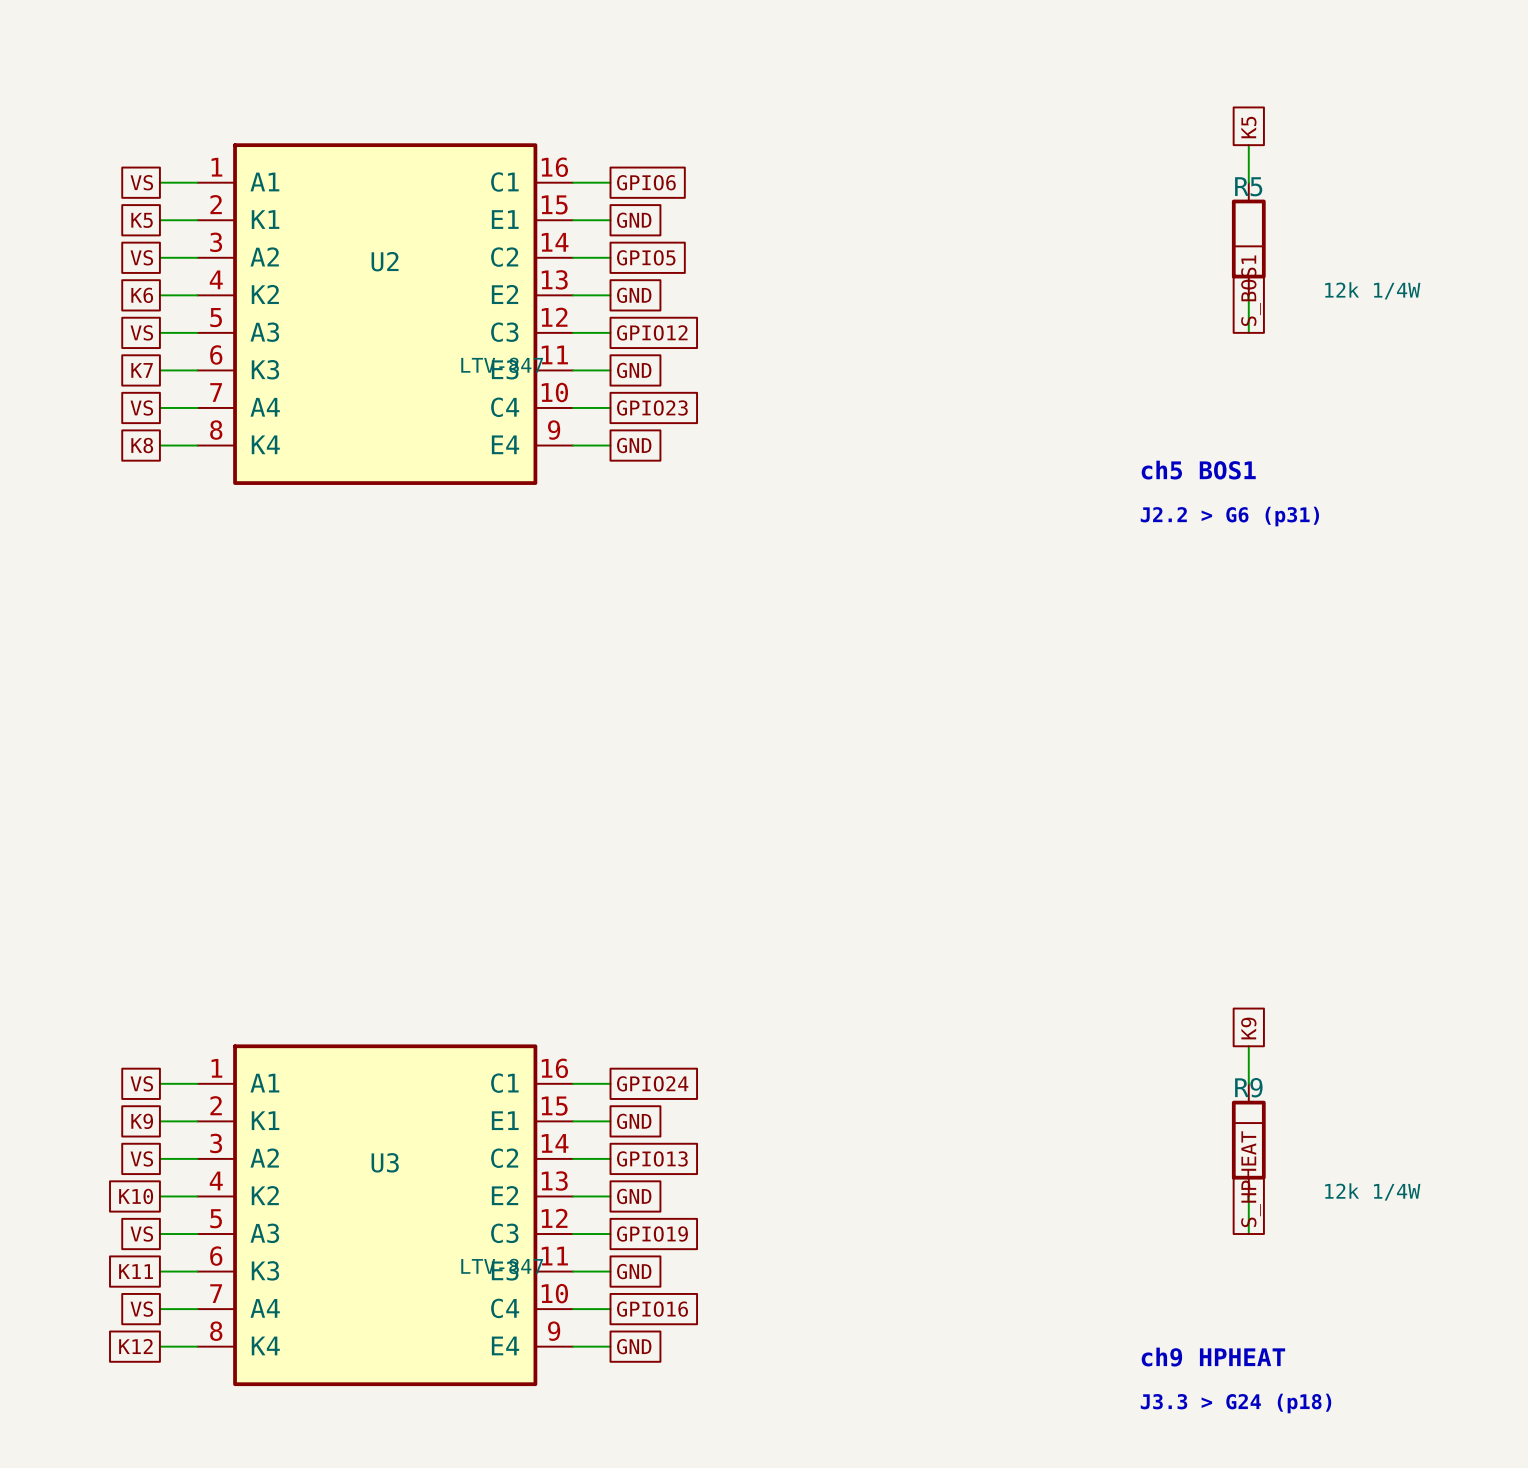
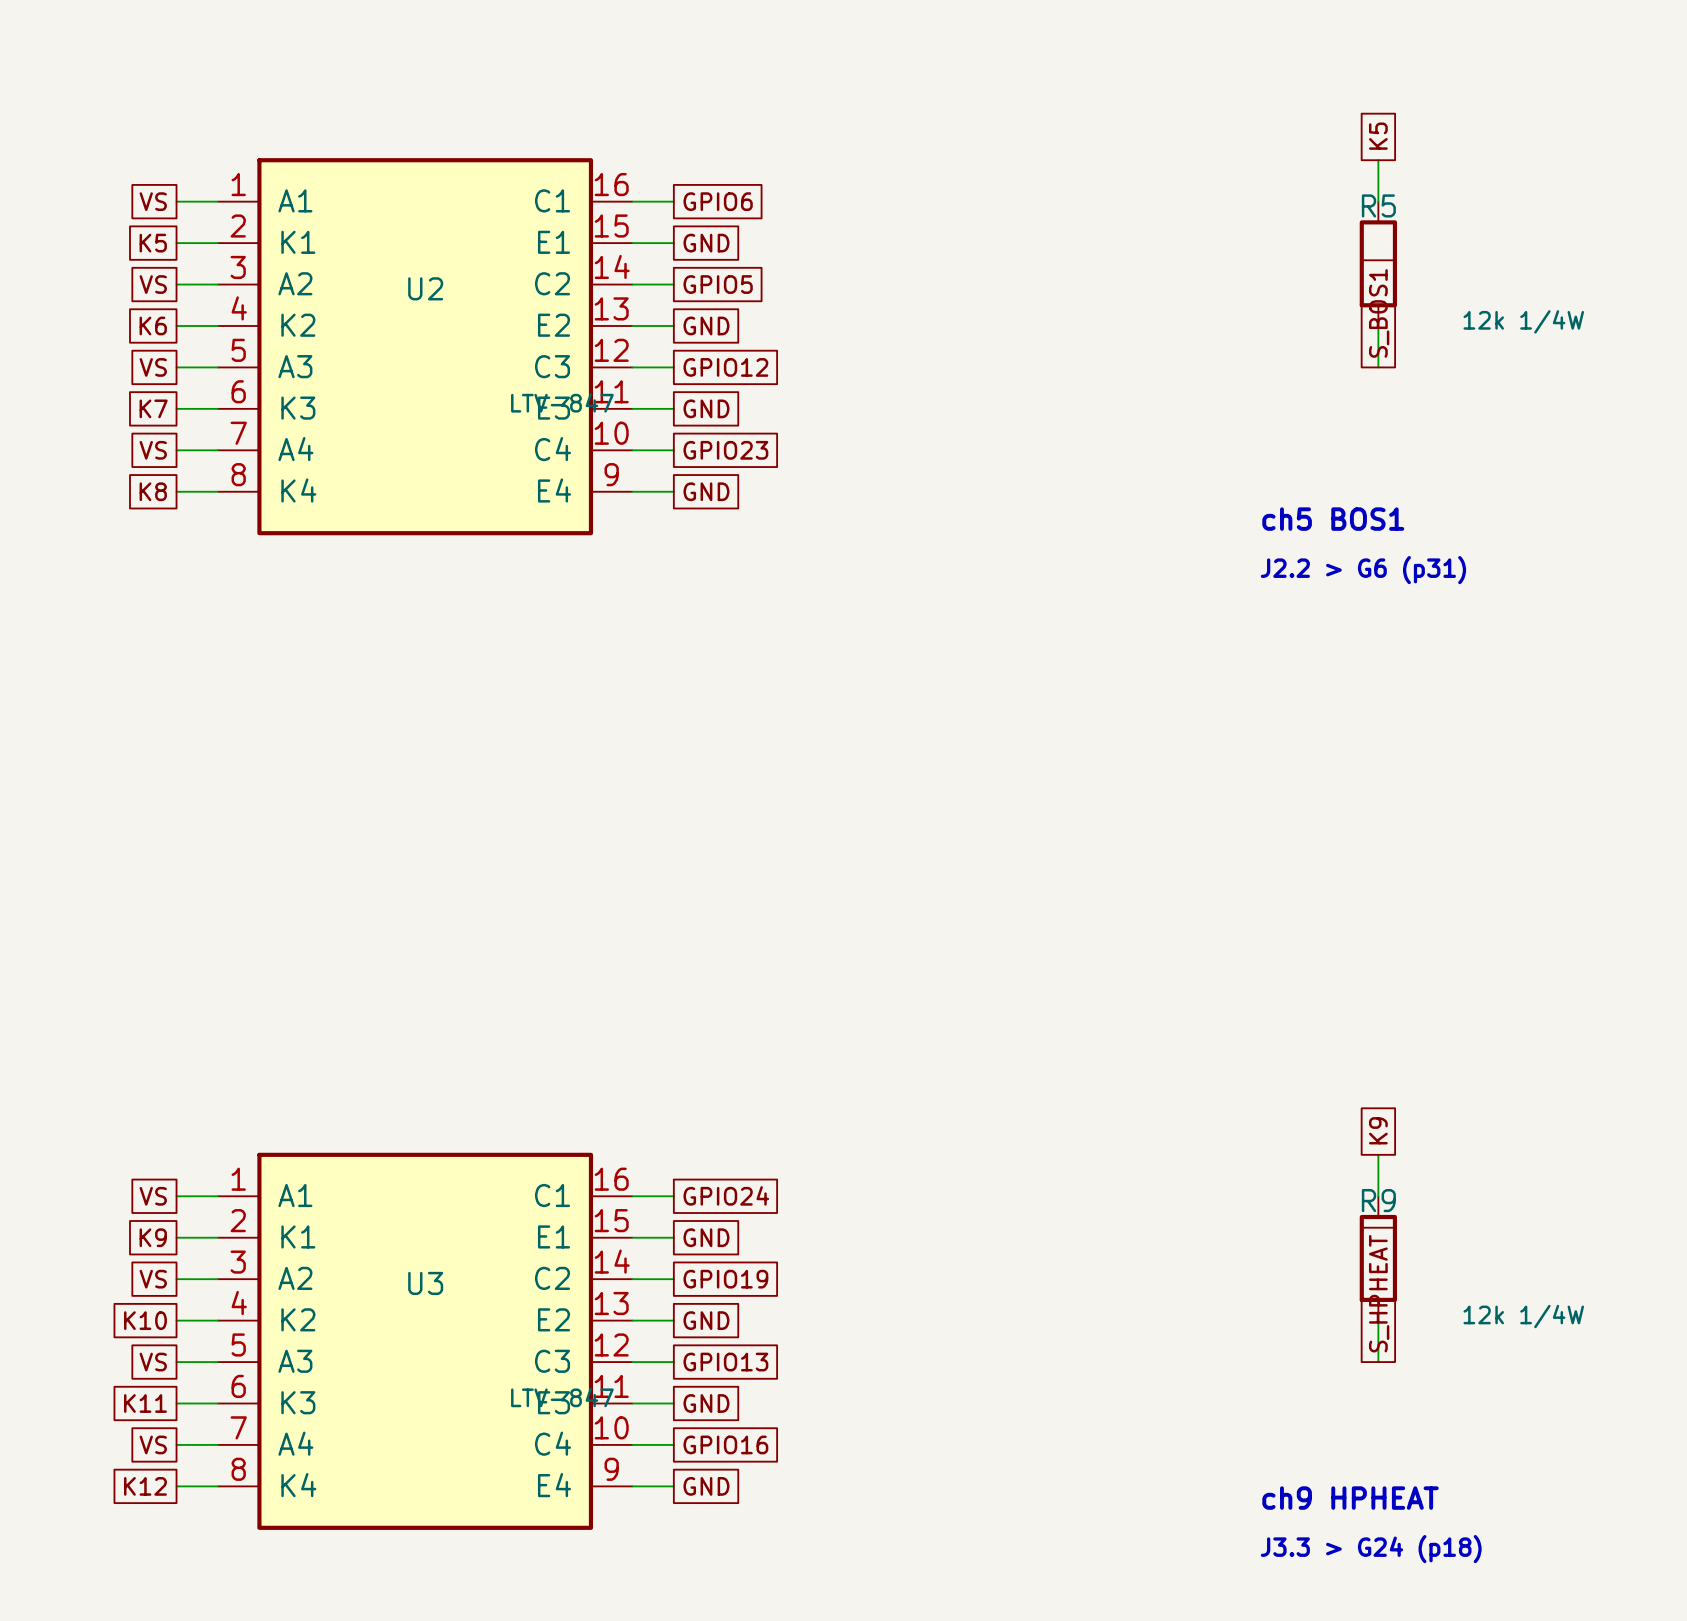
global label: GPIO13 (652, 1158) -> GPIO19 (725, 1279)
global label: GPIO19 (652, 1234) -> GPIO13 (725, 1362)

